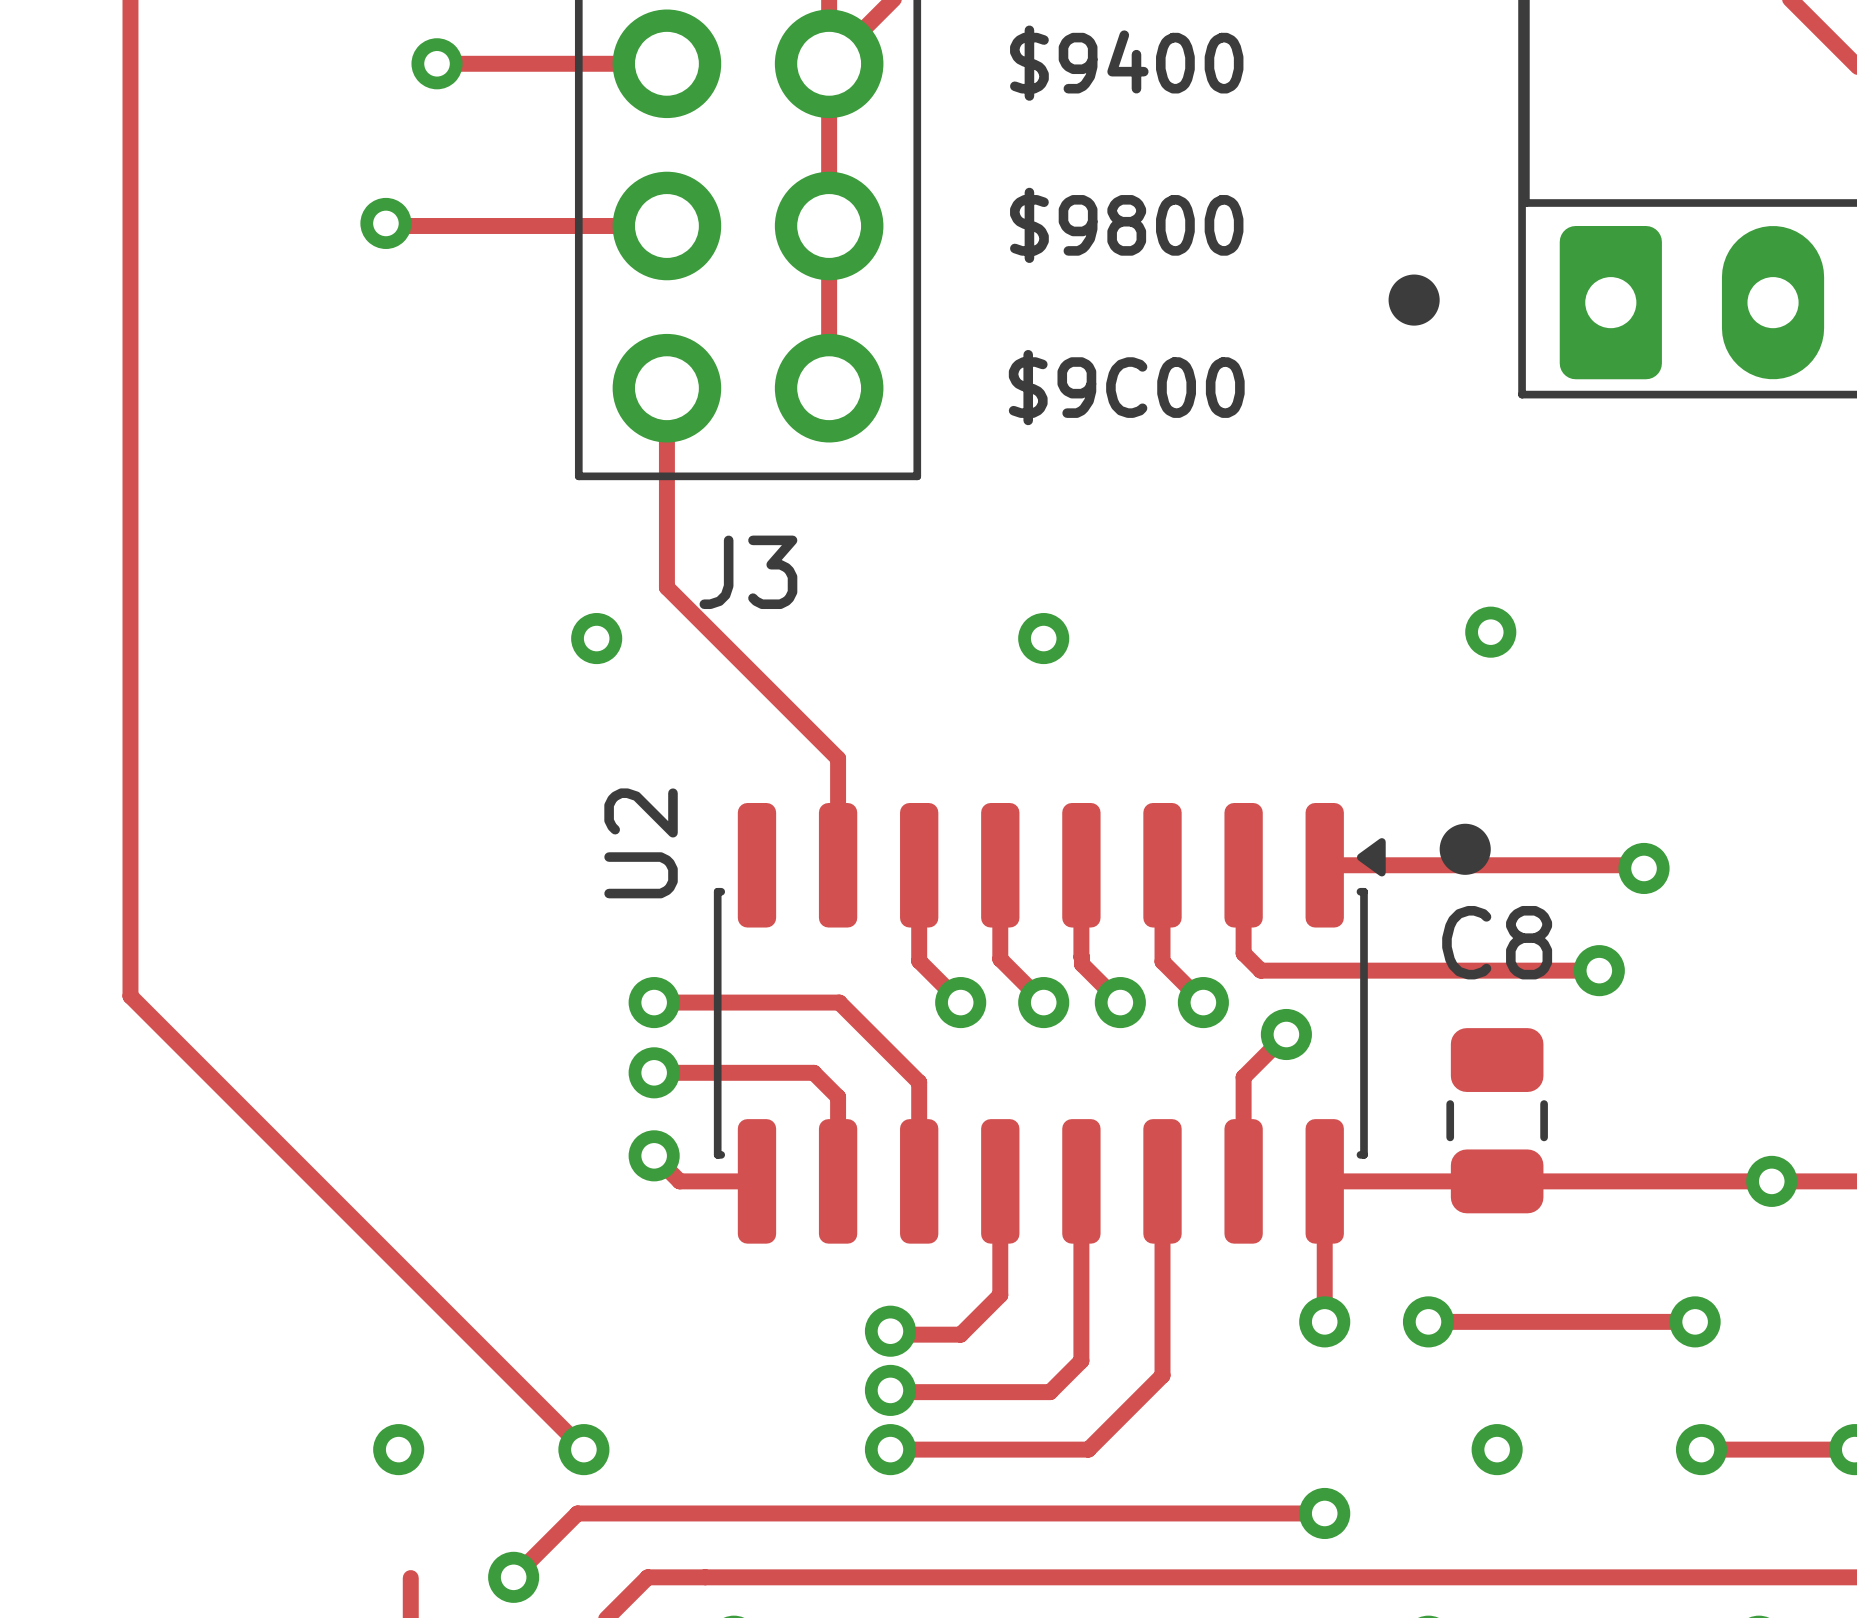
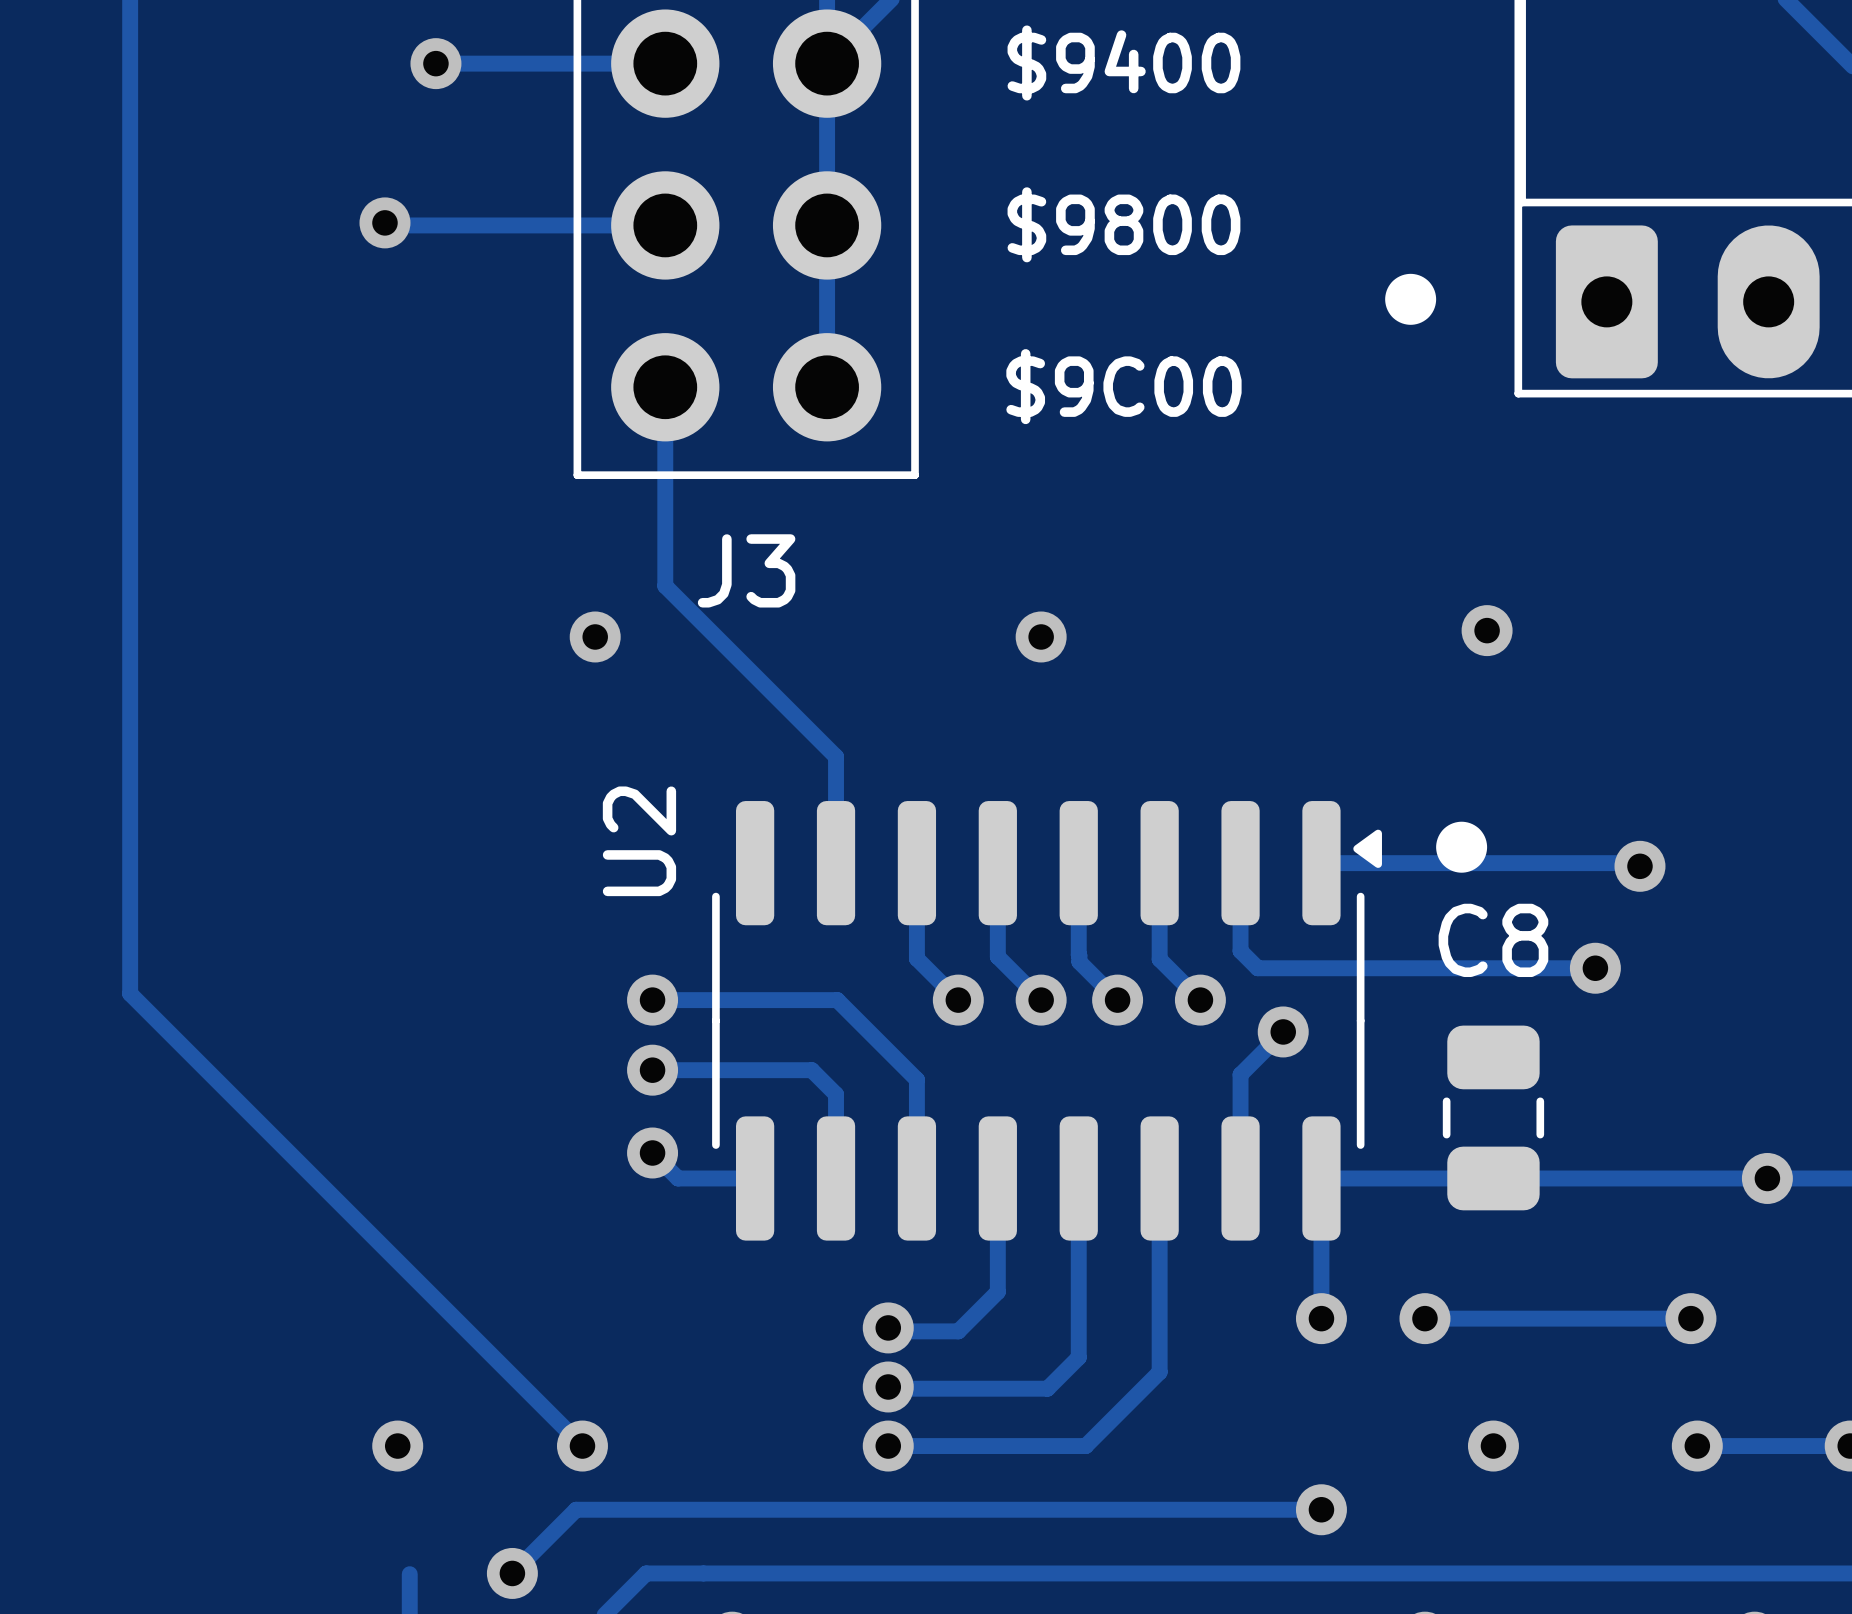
U2 footprint: [713, 803, 1386, 1244] -> [712, 801, 1382, 1241]

